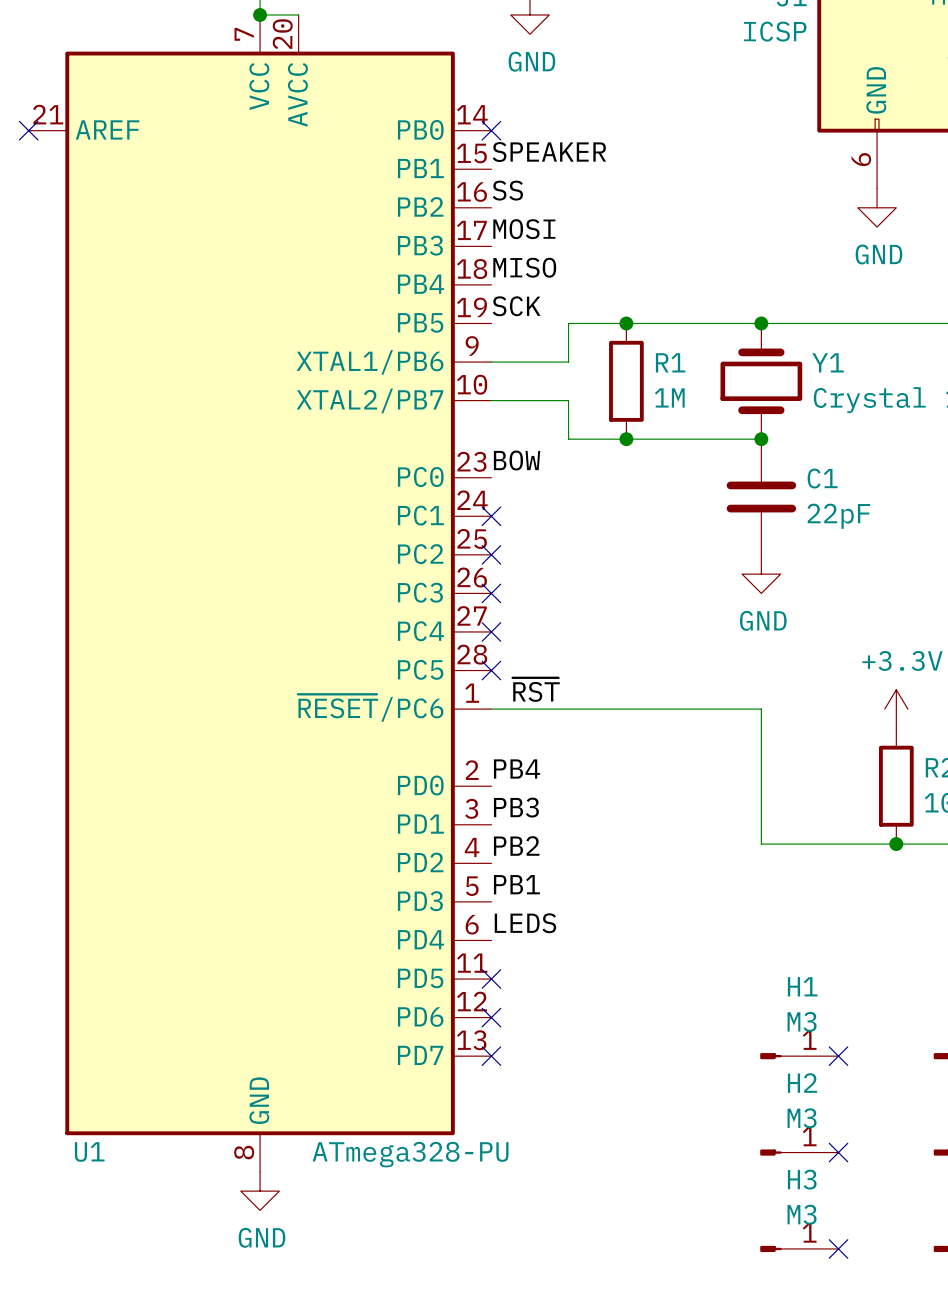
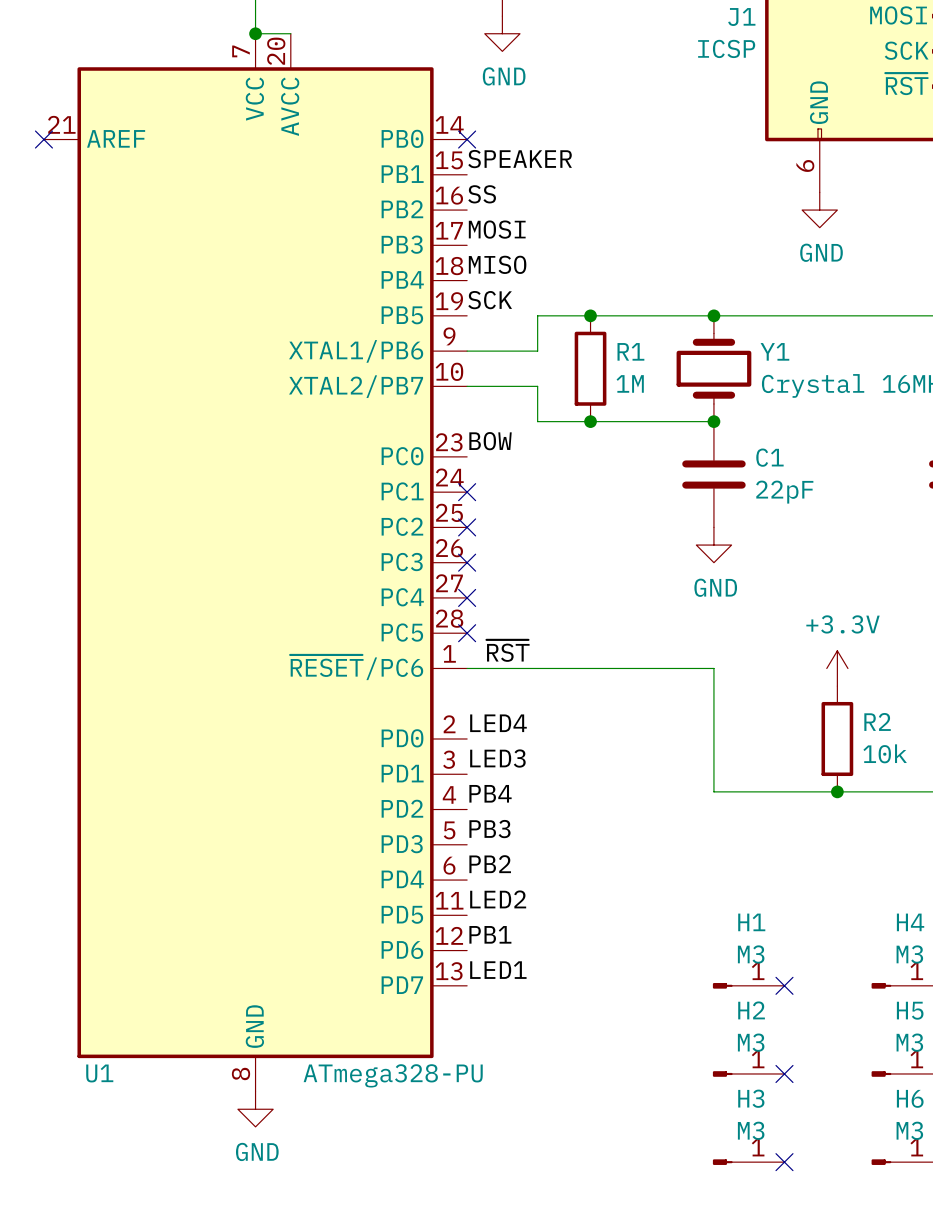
label: PB4 (517, 769) -> LED4 (498, 723)
label: PB3 (516, 807) -> LED3 (497, 758)
label: PB2 (516, 845) -> PB4 (490, 793)
label: PB1 (516, 884) -> PB3 (489, 829)
label: LEDS (525, 923) -> PB2 (490, 864)
label: none -> LED2 (498, 899)
no-connect mark: (491, 979) -> none
label: none -> PB1 (490, 934)
no-connect mark: (491, 1017) -> none
label: none -> LED1 (498, 970)
no-connect mark: (491, 1056) -> none

